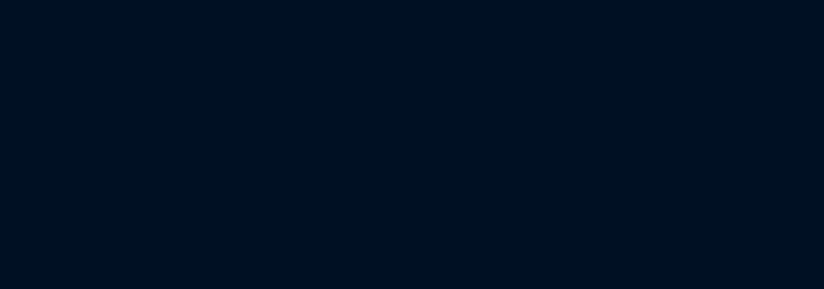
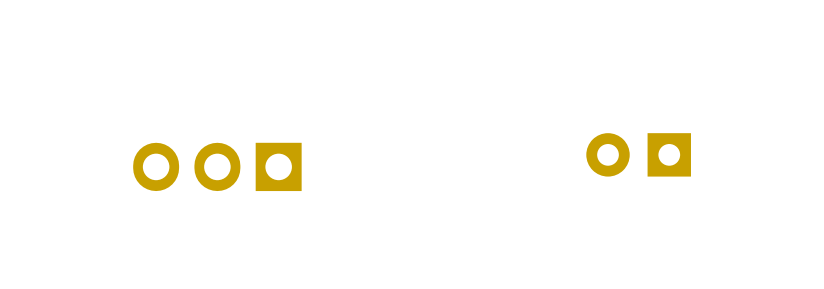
part: none -> (638, 154)
part: none -> (217, 166)

